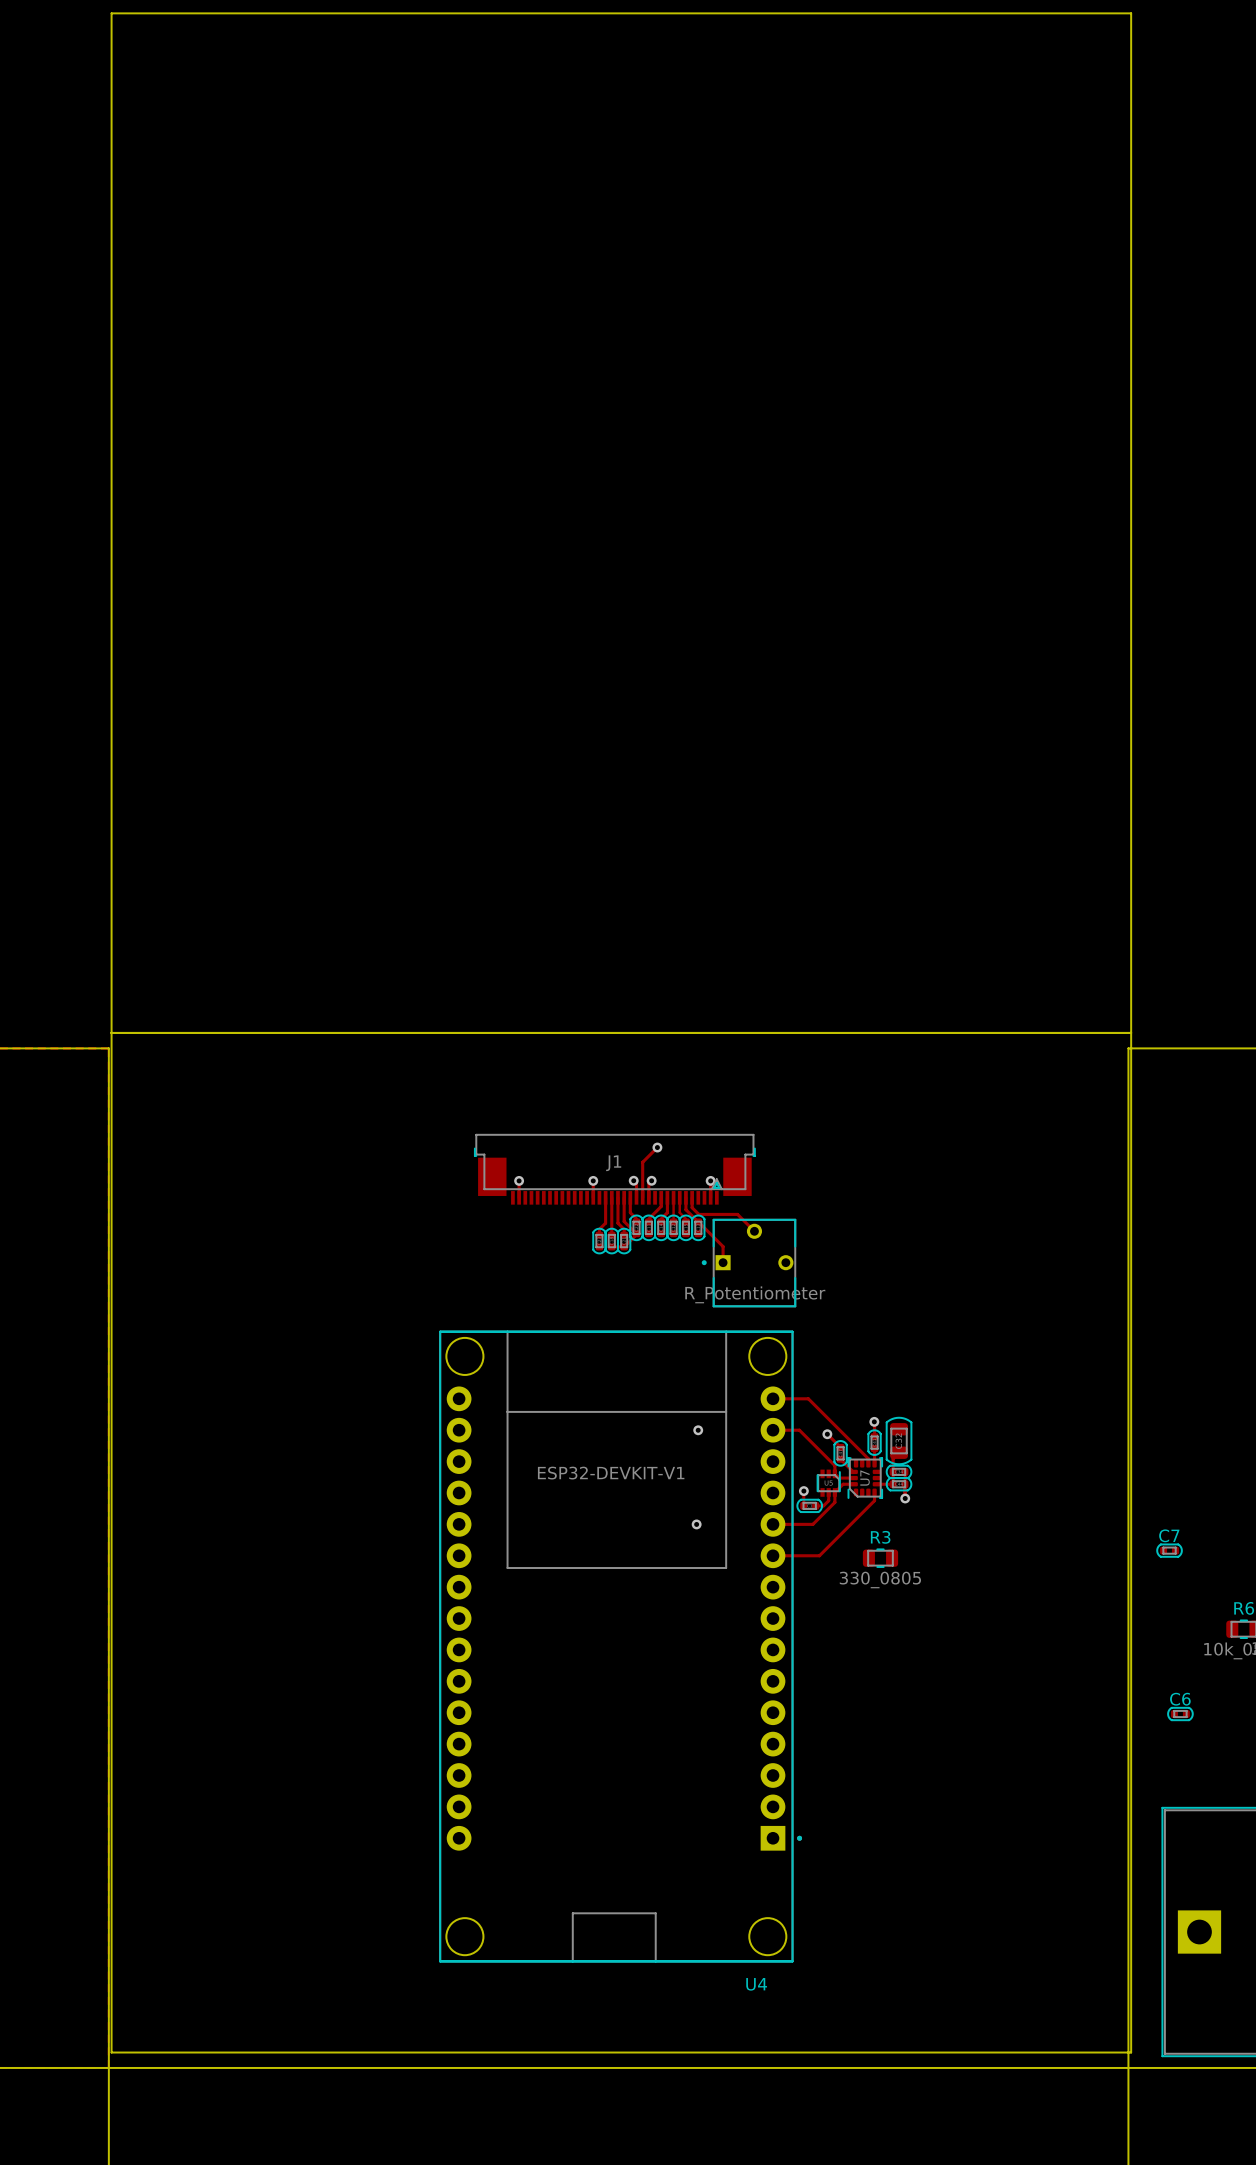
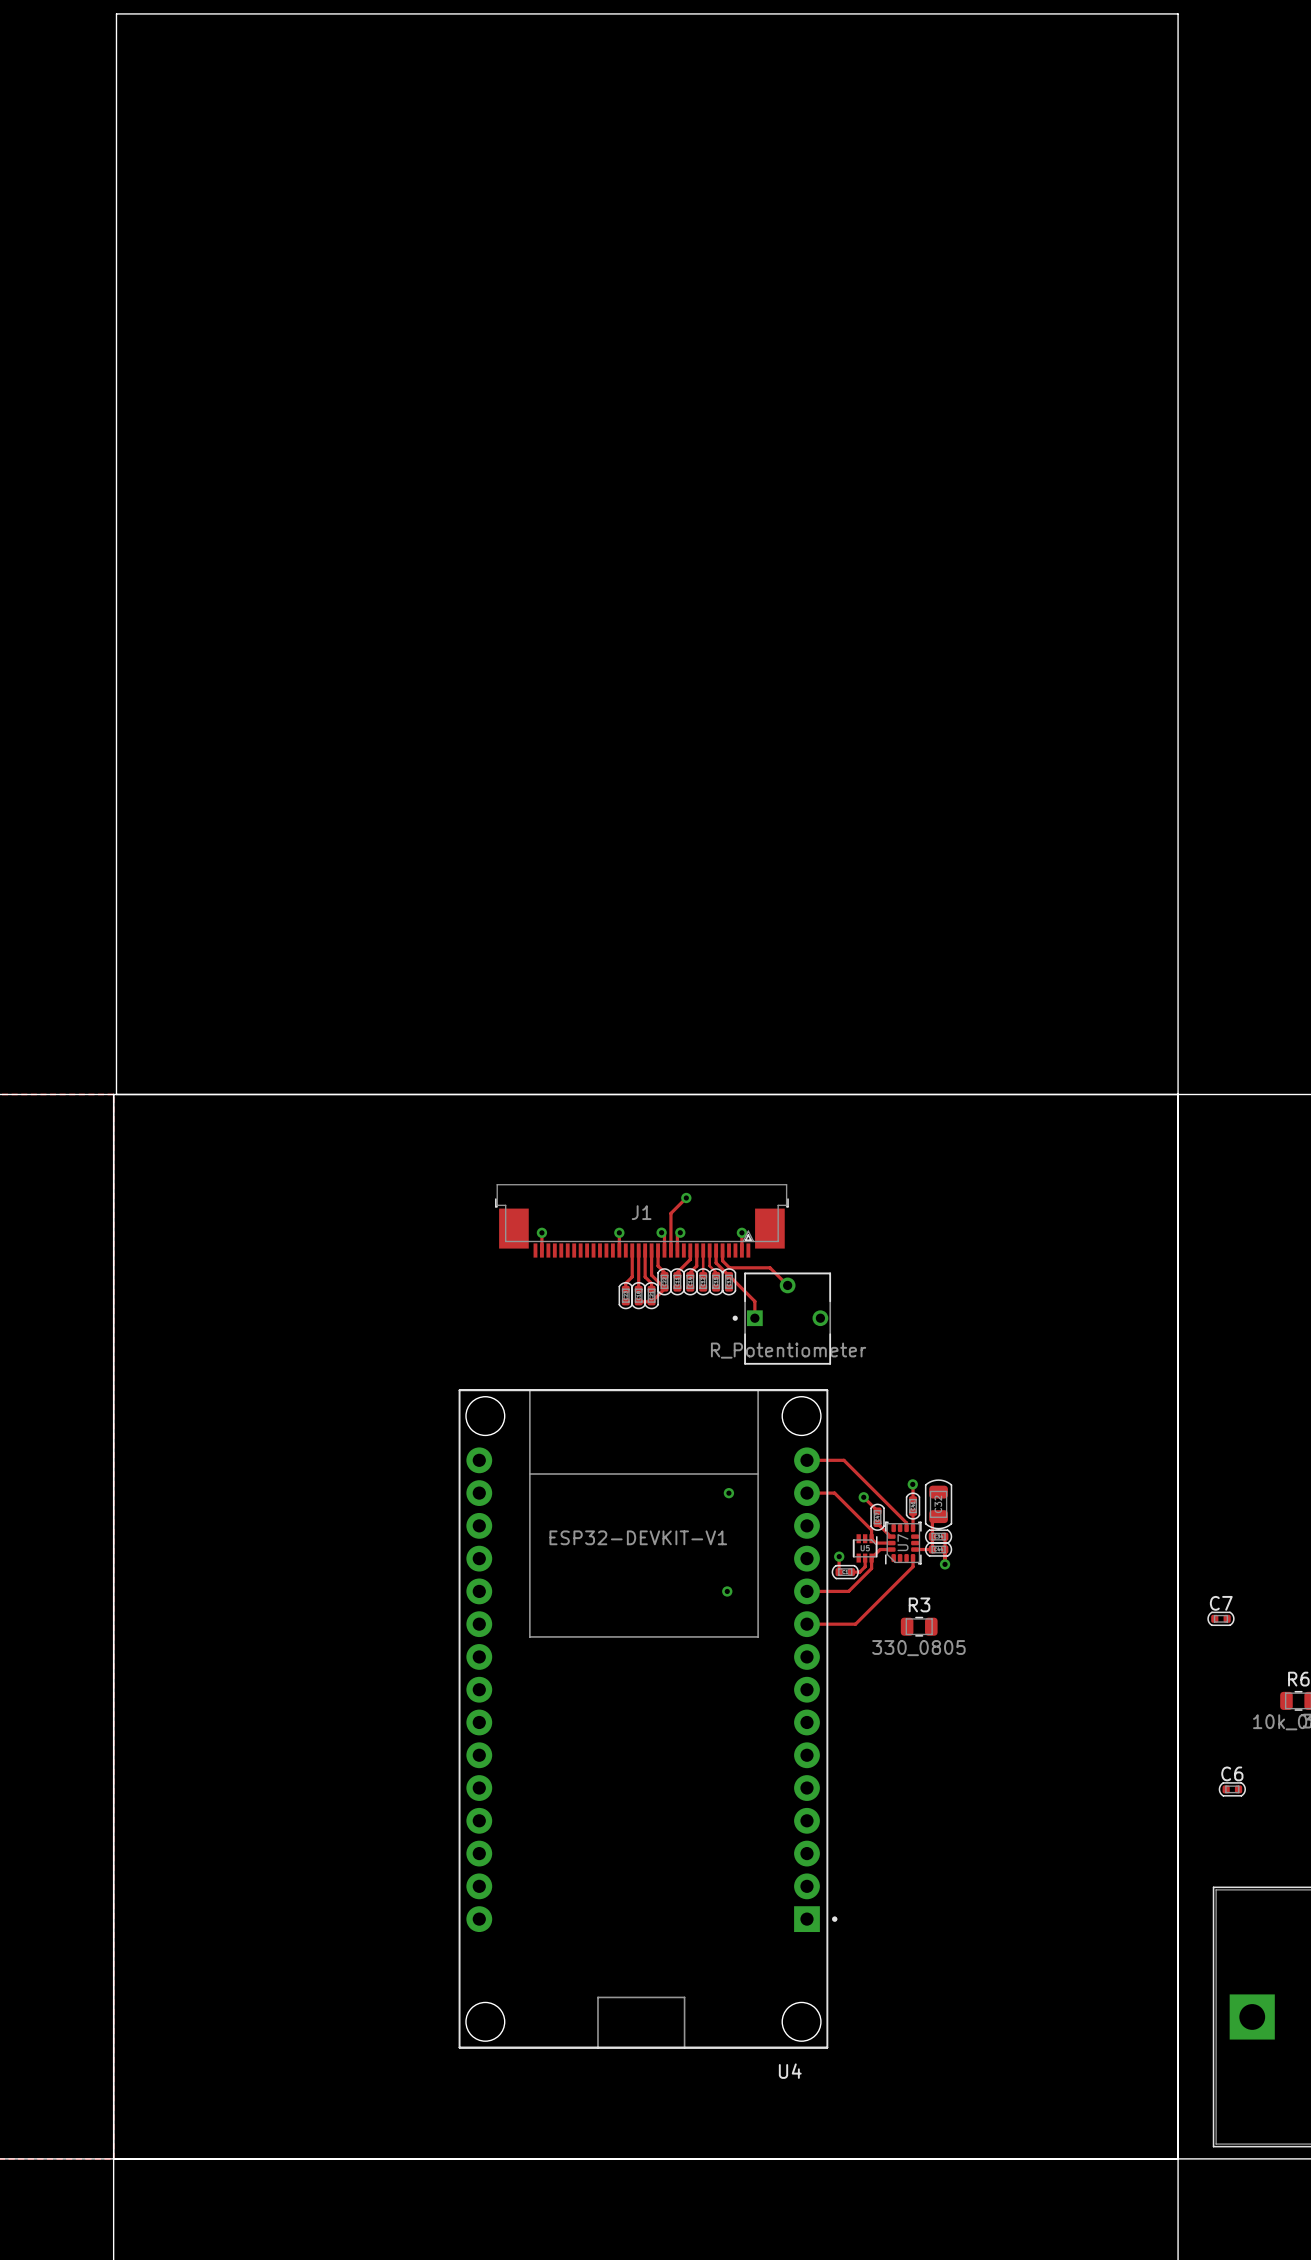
board edge: (1128, 13) (1131, 13) (1131, 2052) (111, 2052) (111, 1048) -> (1178, 13) (1178, 1094) (113, 1094)

